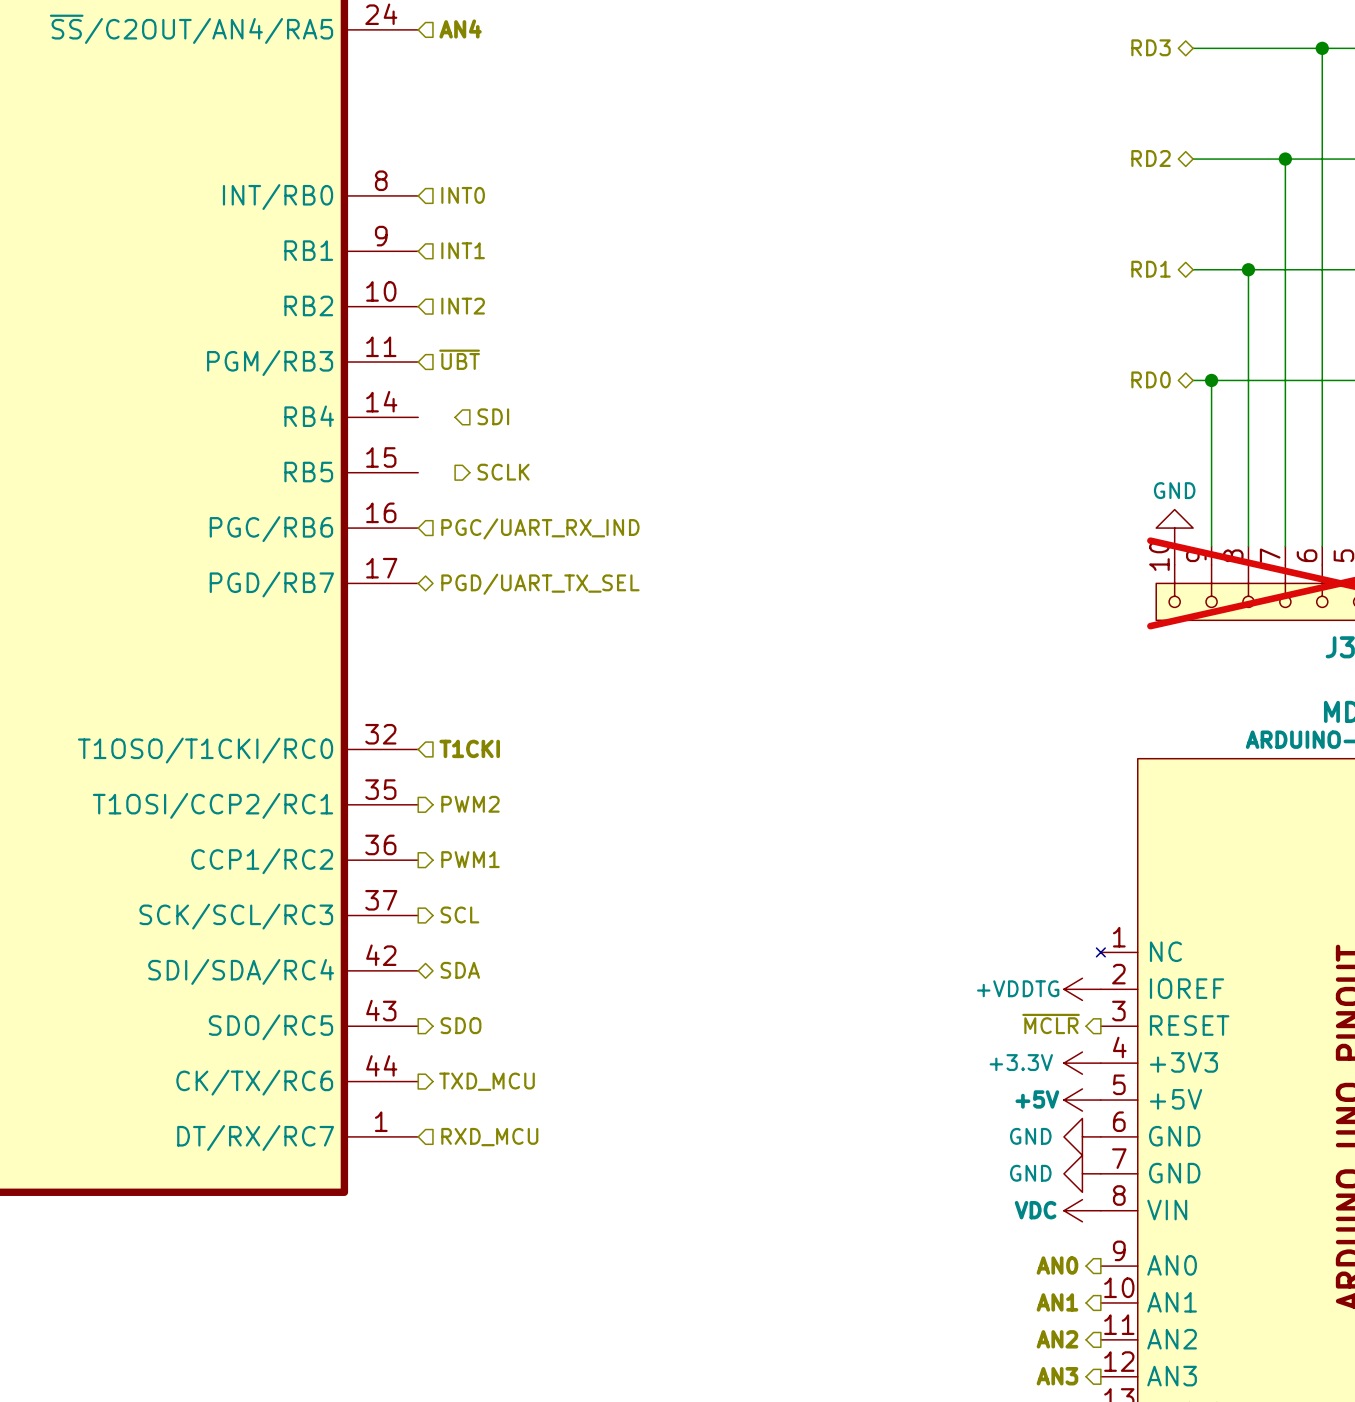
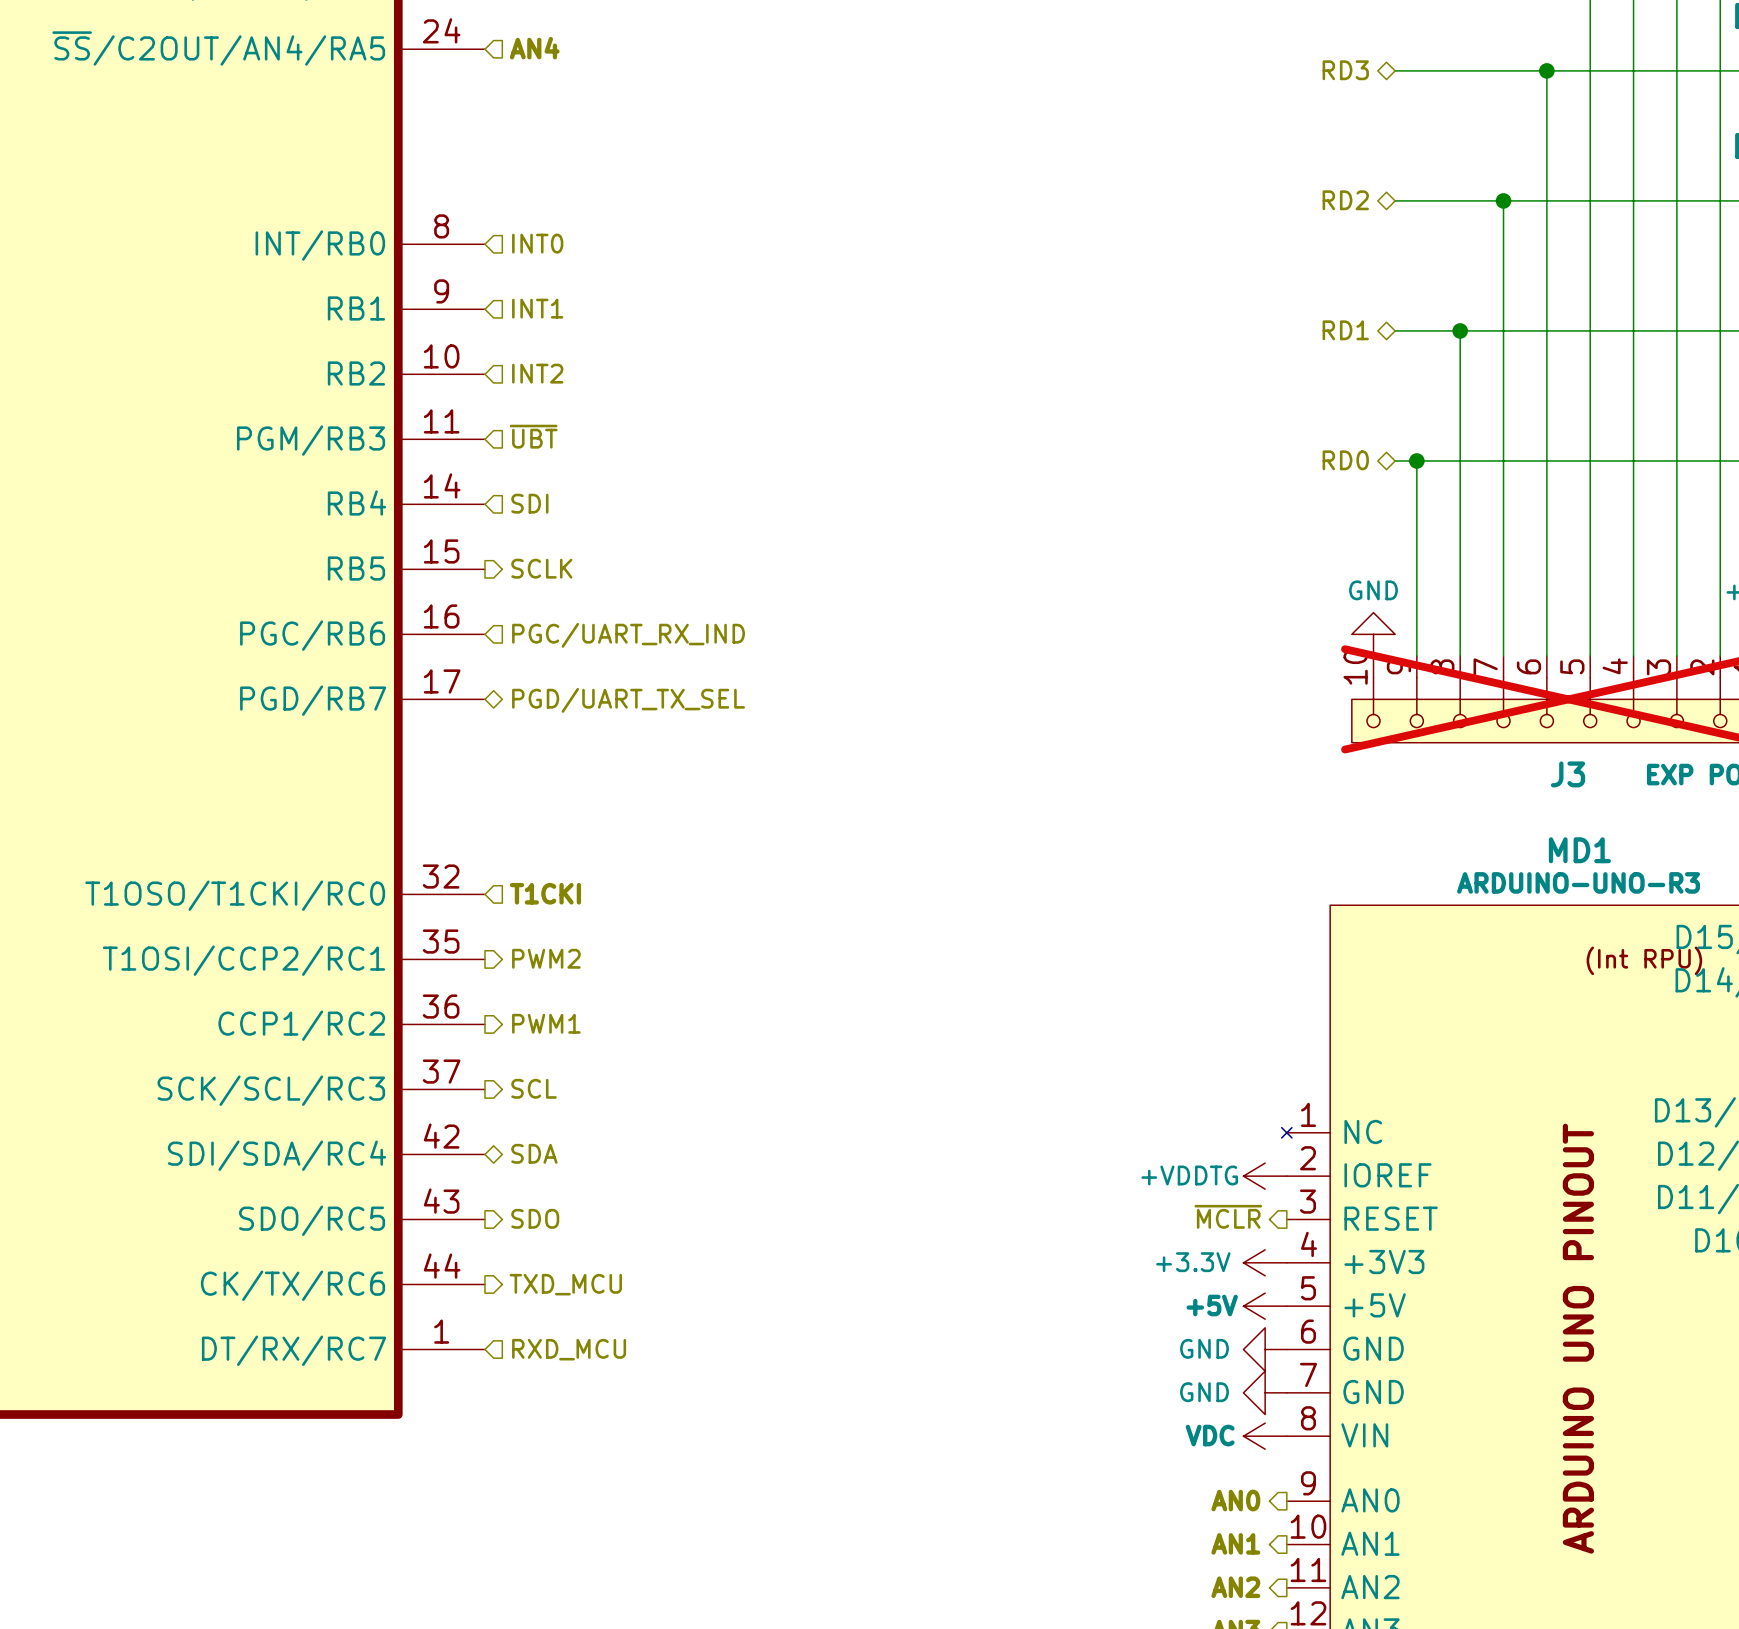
hierarchical label position: SDI (493, 416) -> SDI (529, 503)
hierarchical label position: SCLK (503, 472) -> SCLK (541, 568)

